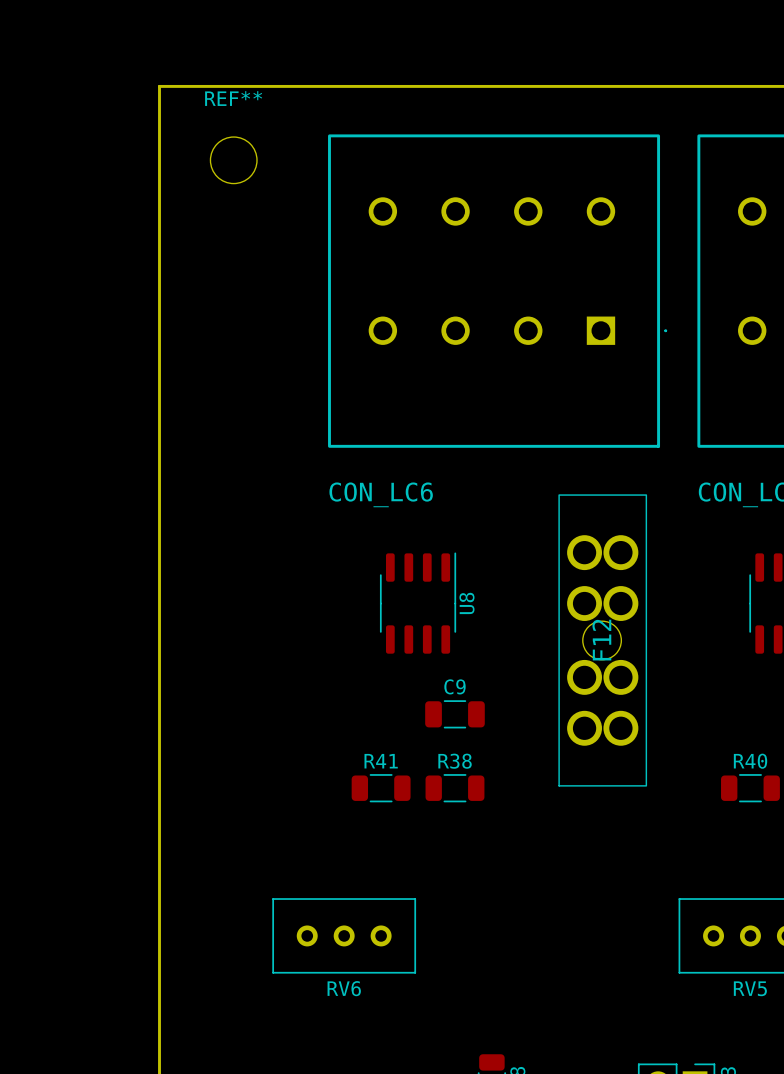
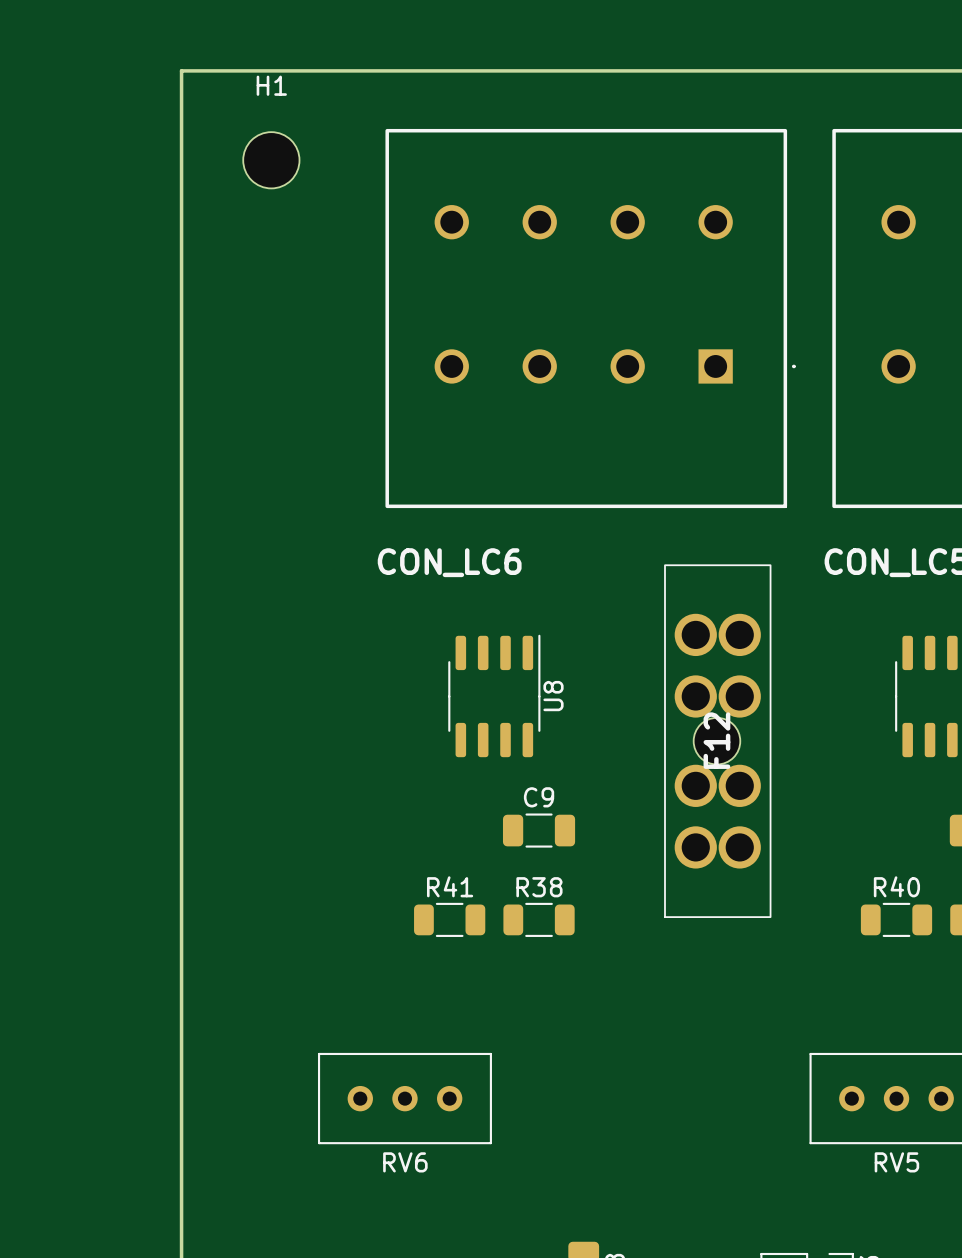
REF** name: REF** (233, 98) -> H1 (271, 85)

